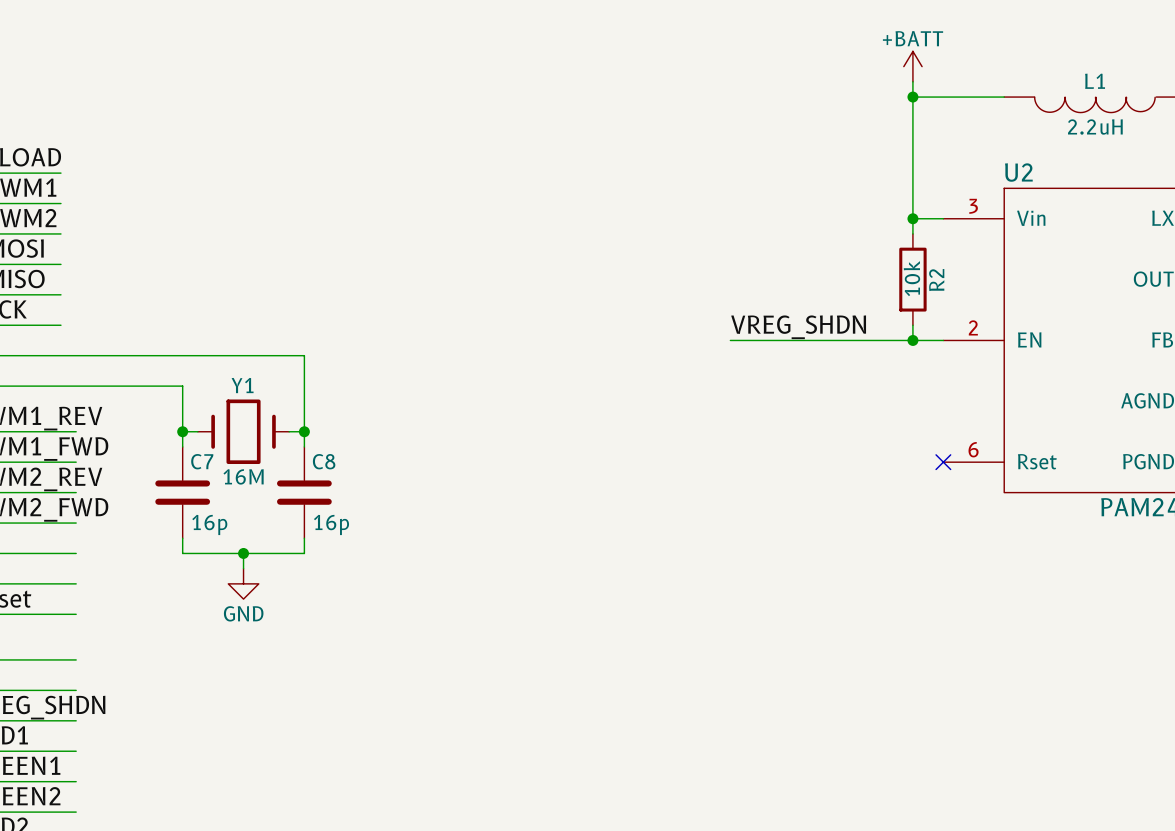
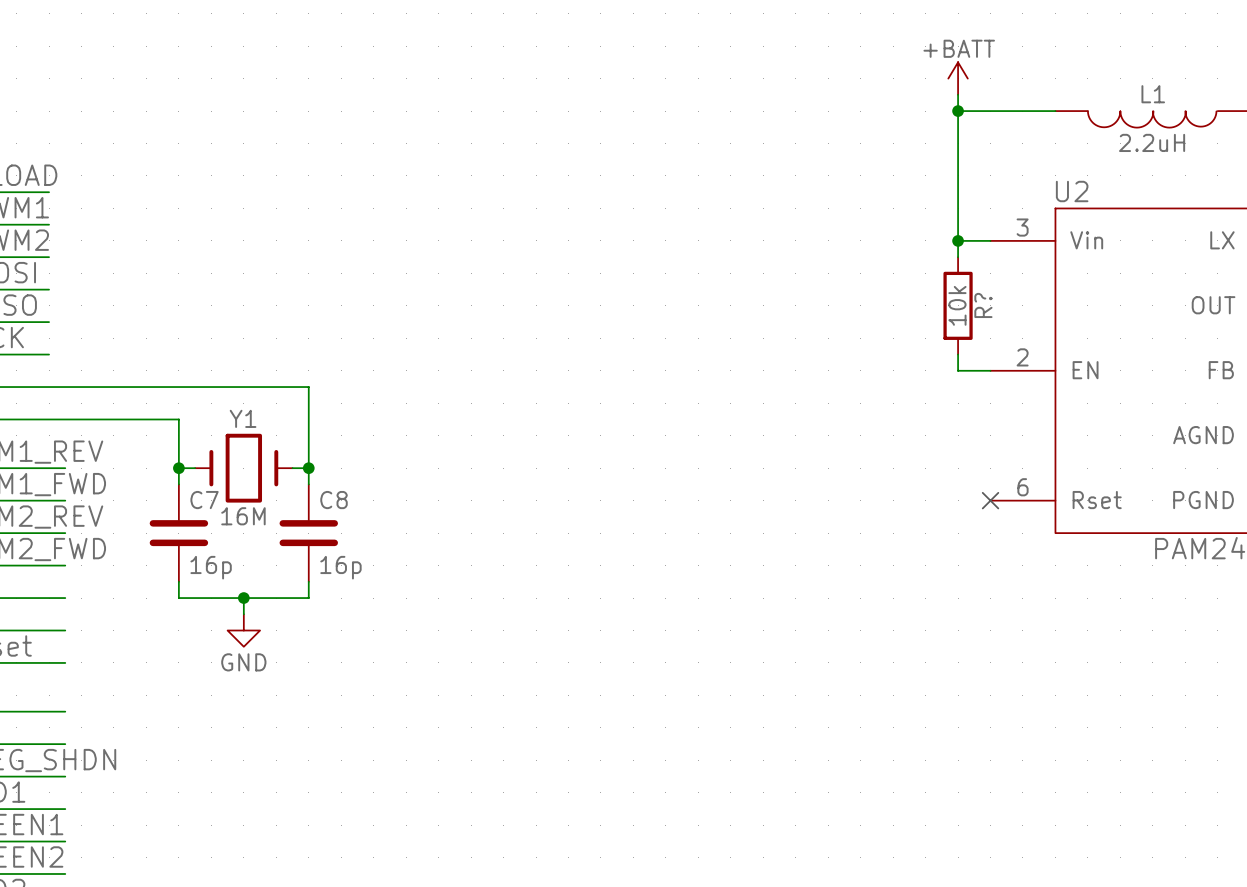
R2 name: R2 (936, 280) -> R? (983, 305)
label: VREG_SHDN (798, 327) -> none
wire: (730, 340) (912, 340) -> none
junction: (912, 340) -> none

